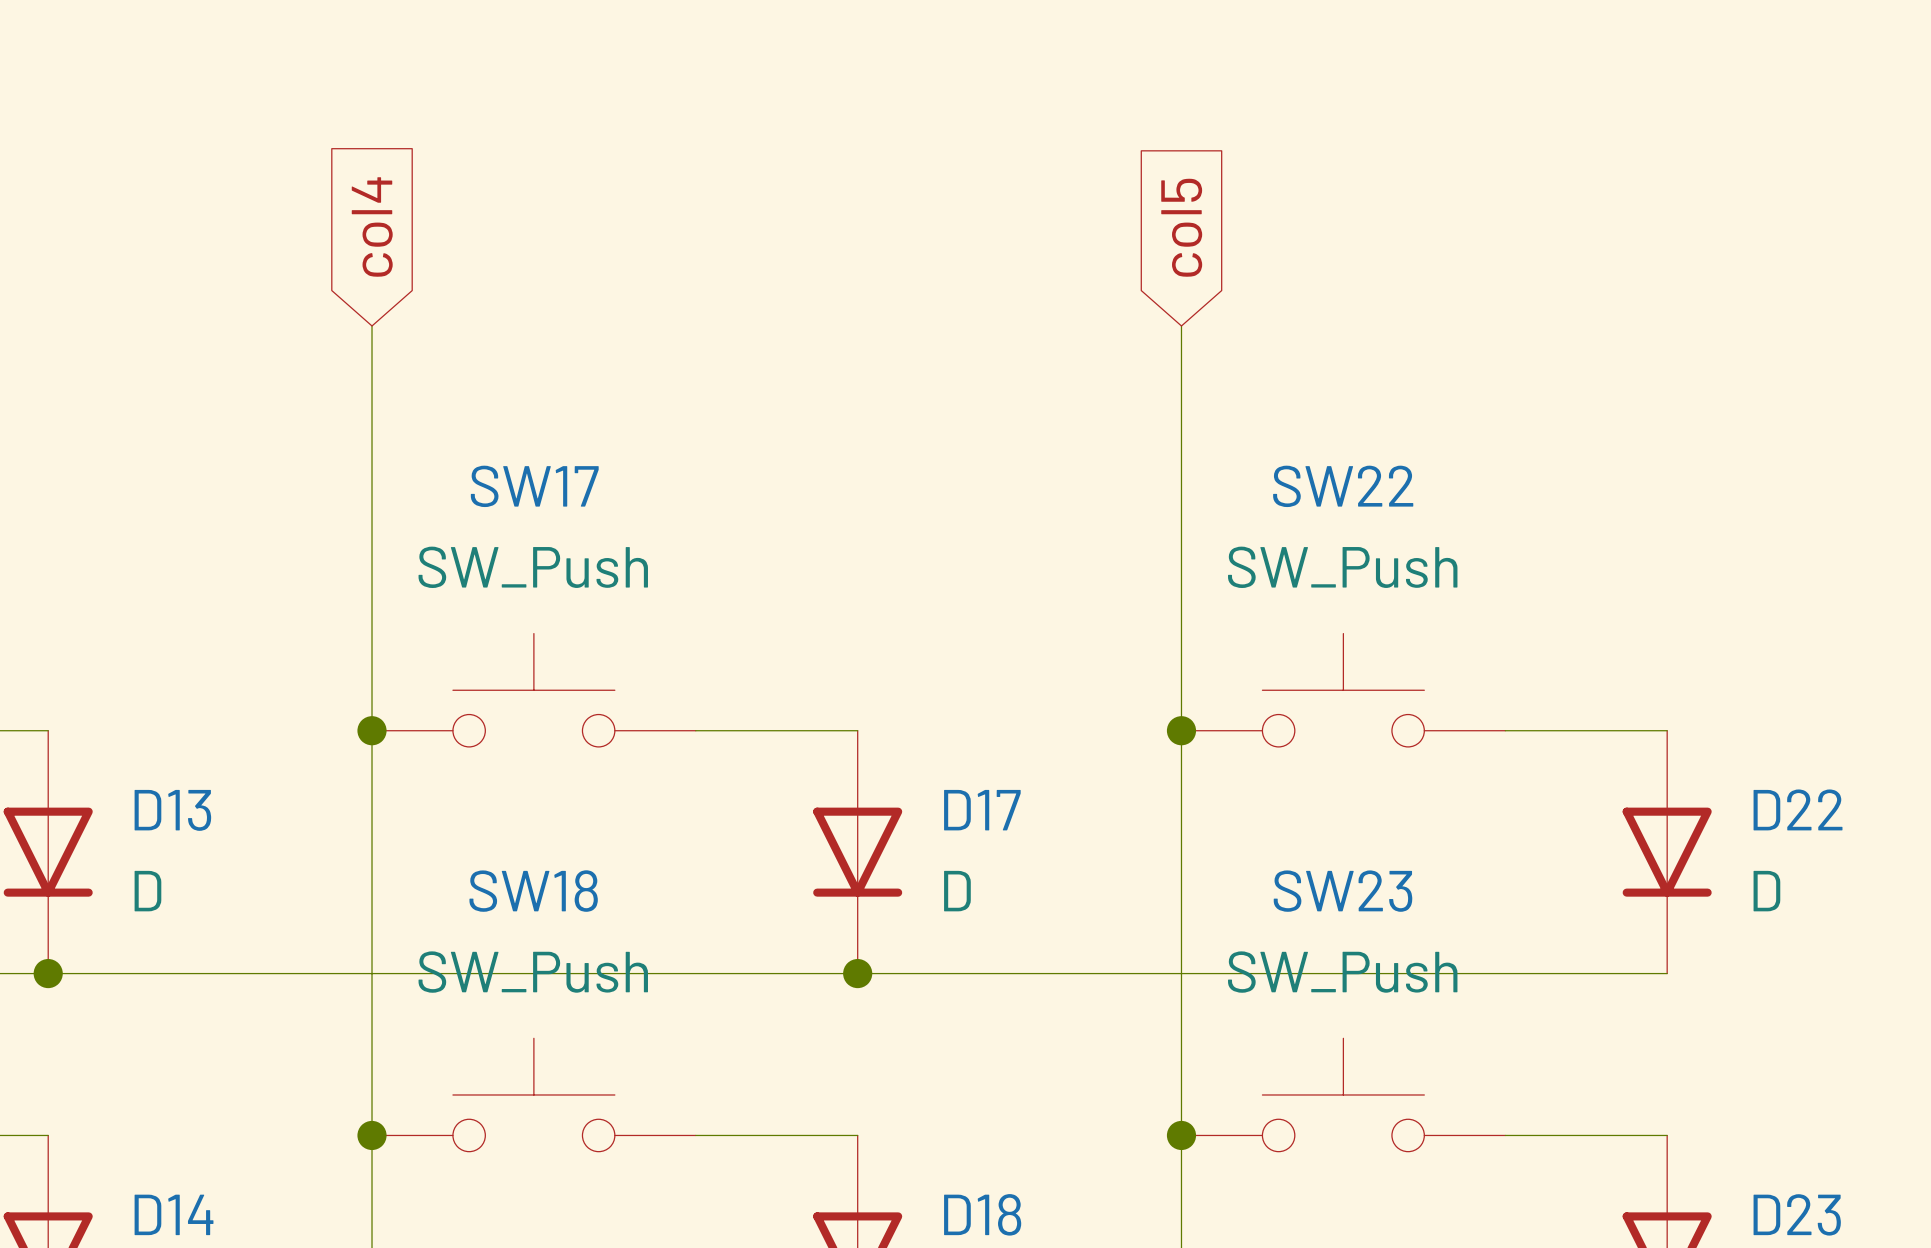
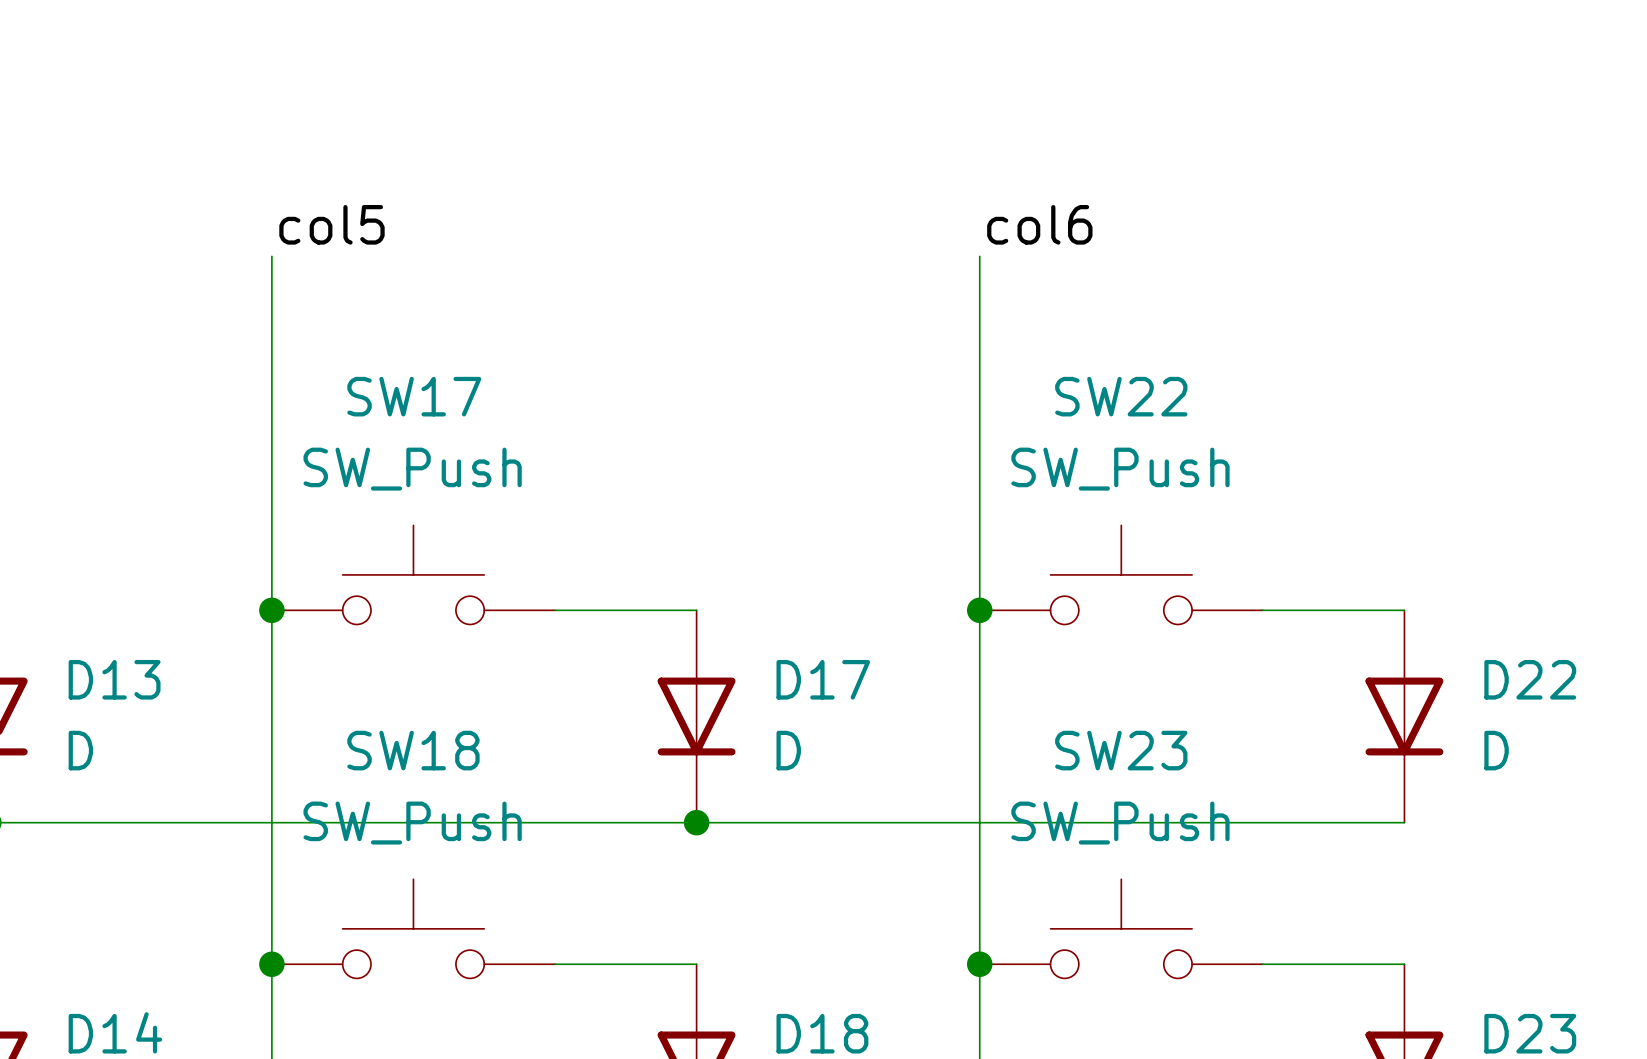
global label: col4 (372, 226) -> none
global label: col5 (1181, 227) -> none
label: none -> col6 (1039, 224)
label: none -> col5 (331, 224)

